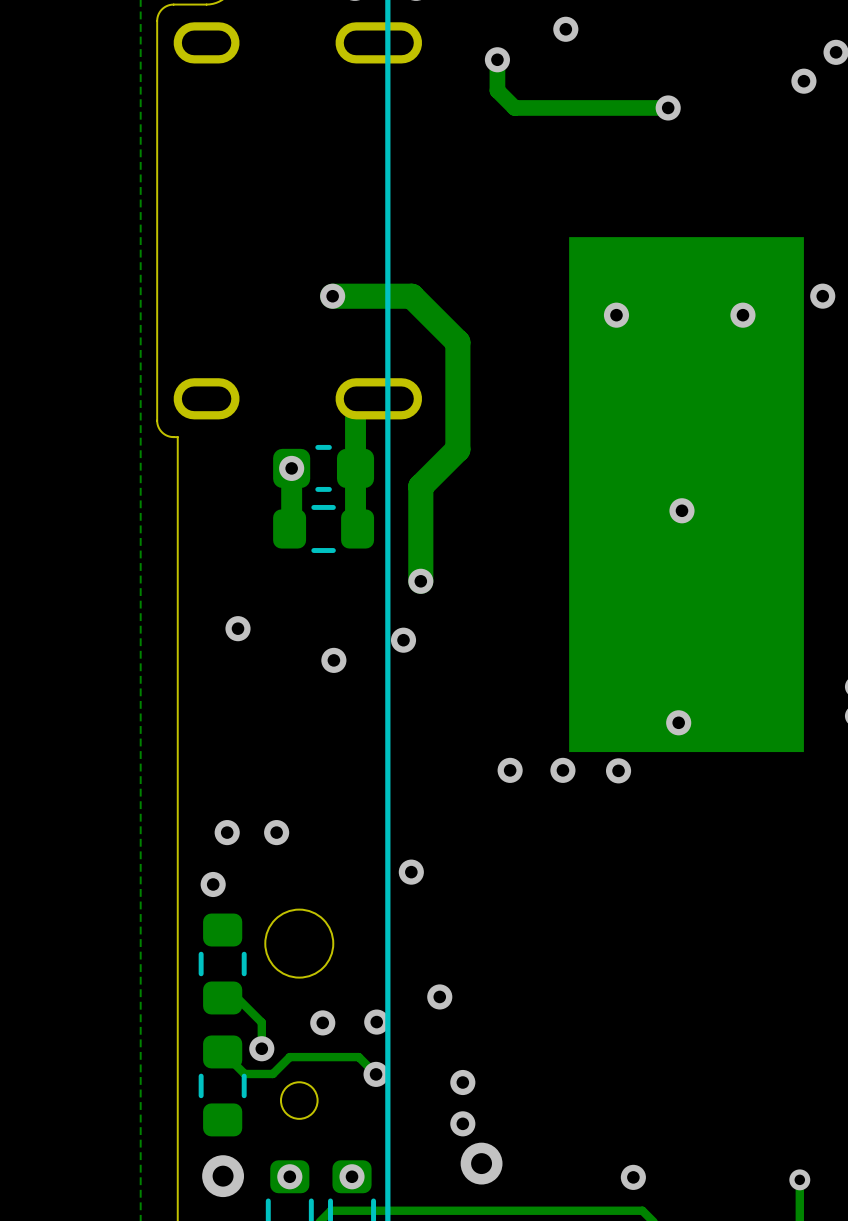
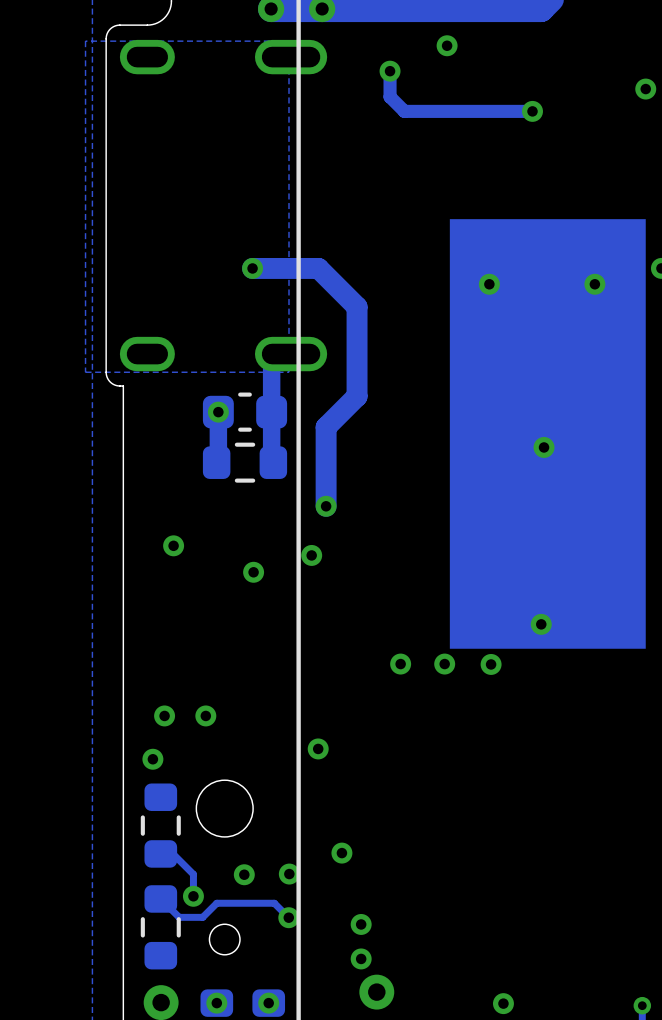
zone outline: none -> (289, 41) (289, 372) (85, 372) (85, 41) (289, 41)

